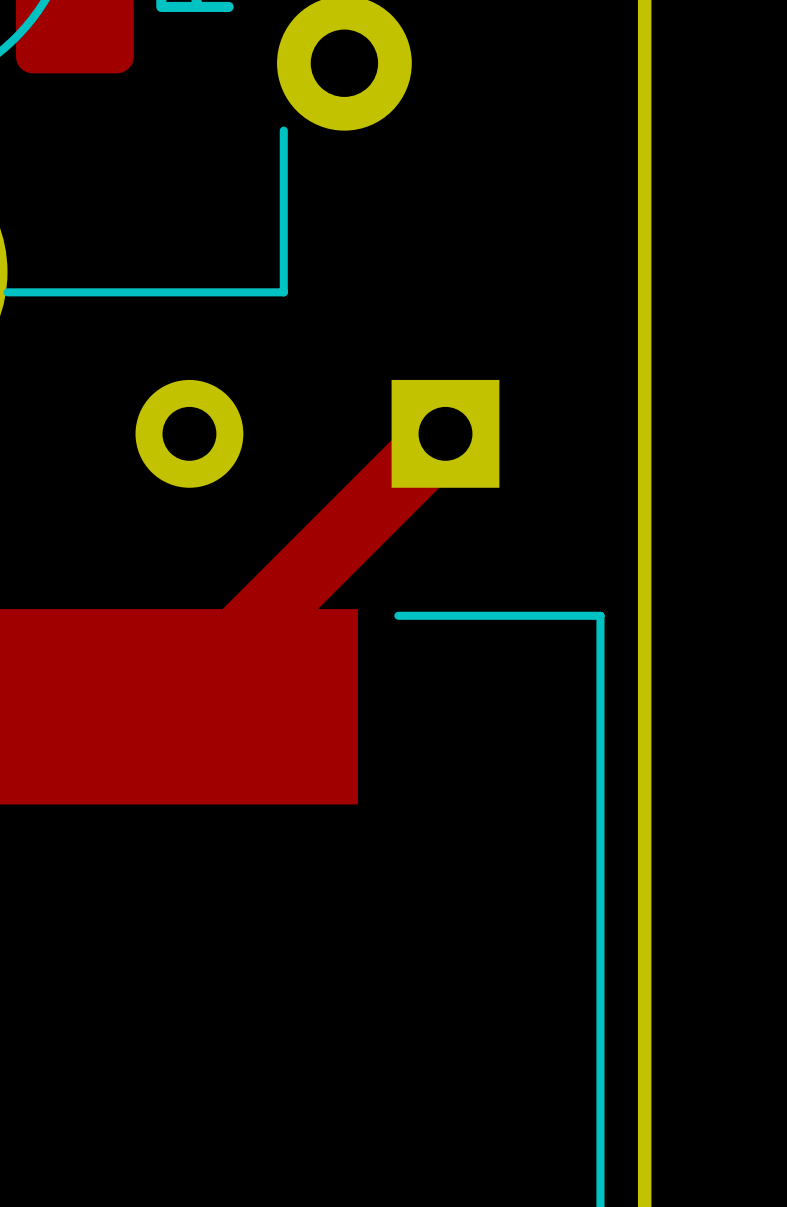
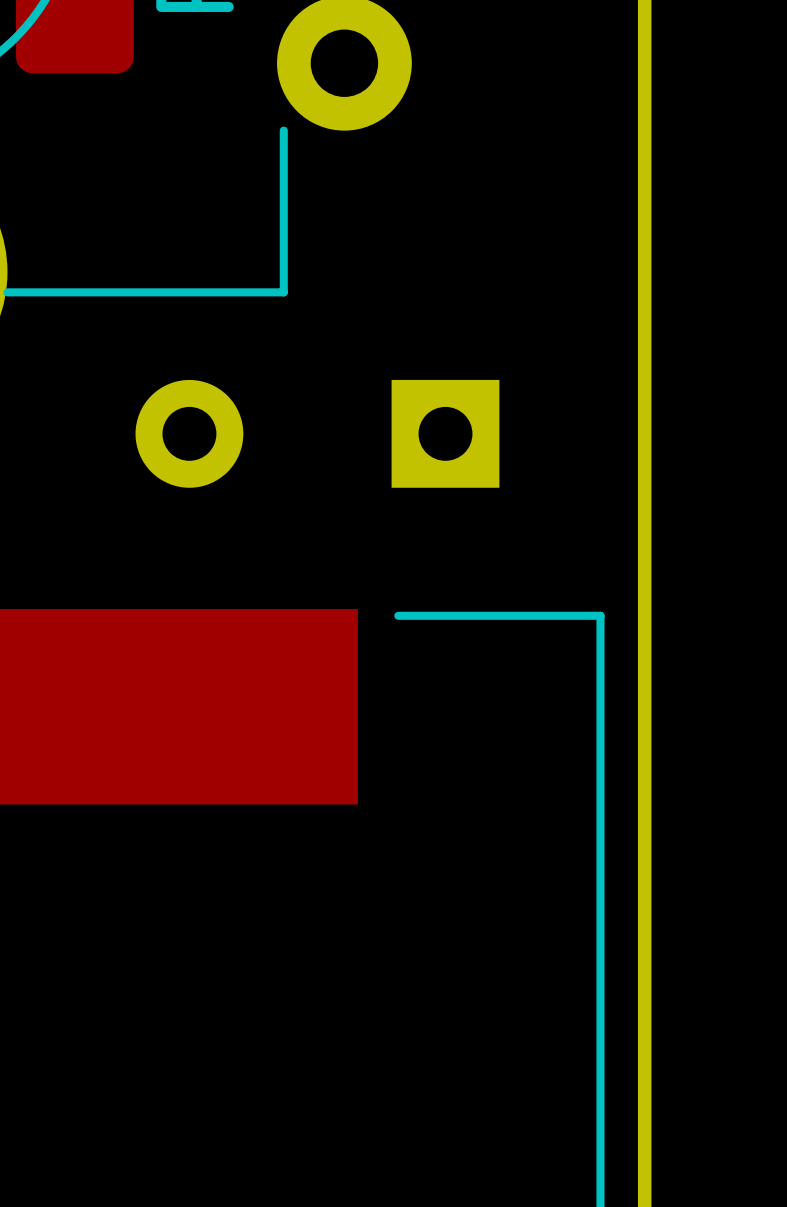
track: (445, 433) (175, 703) (175, 706) -> none

